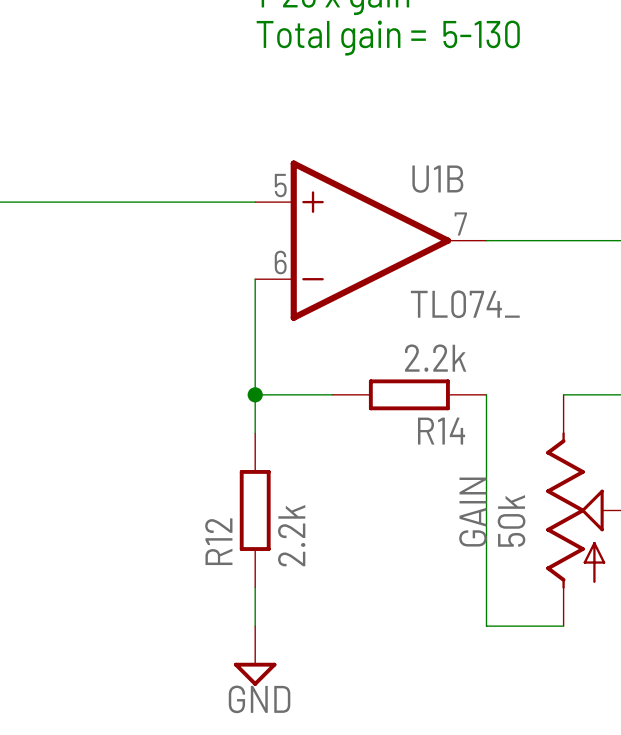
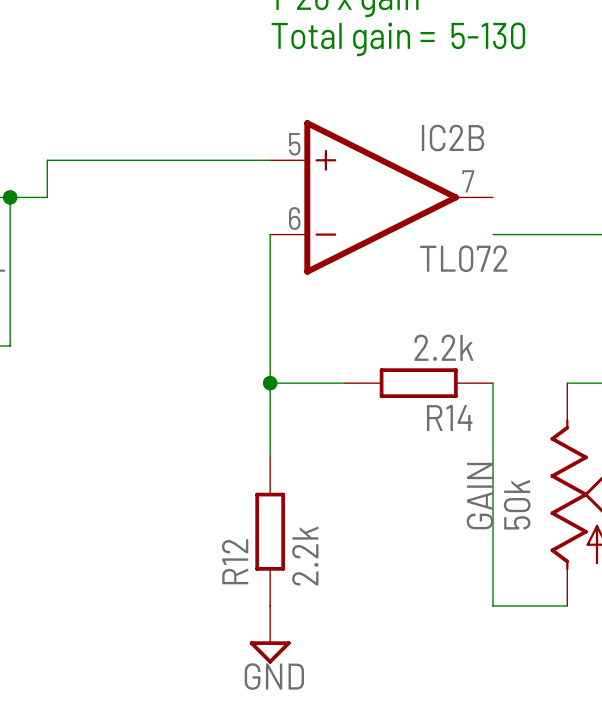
wire: (23, 202) (255, 202) -> (47, 197) (47, 160) (270, 160)
IC2B: none -> TL072 (381, 197)
wire: none -> (270, 234) (270, 271)
U1B: TL074_ (370, 240) -> none
R12 position: (255, 510) -> (270, 531)

